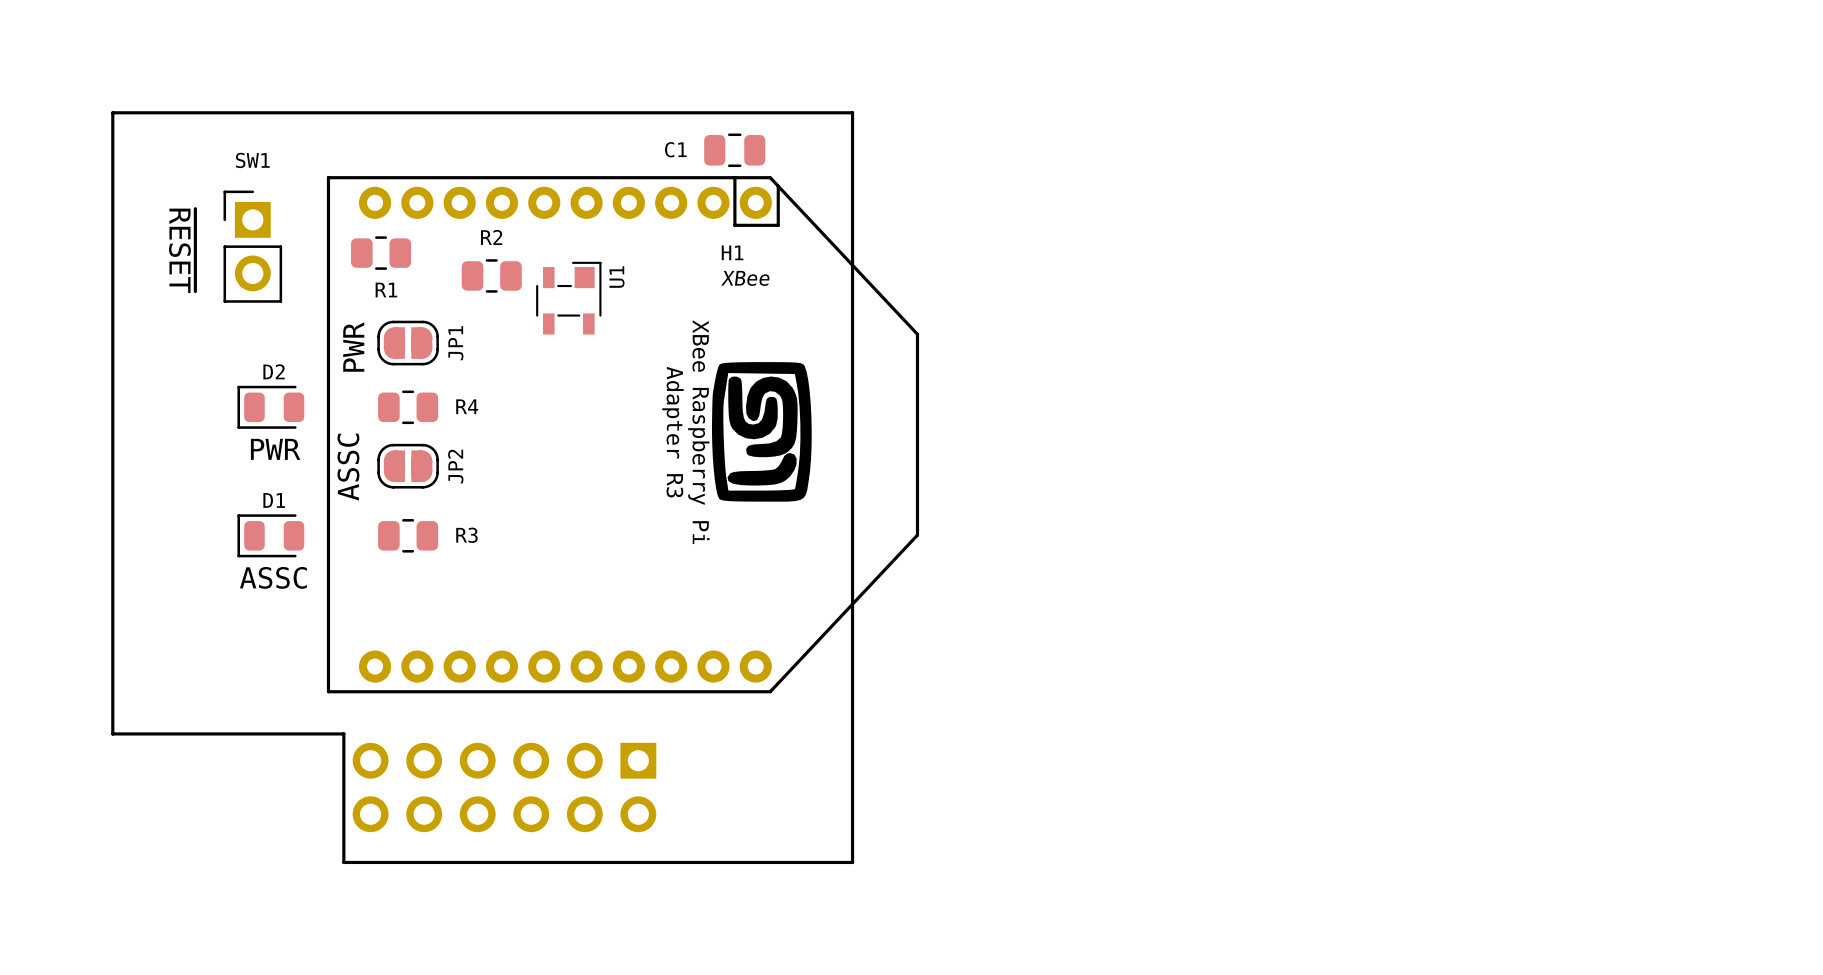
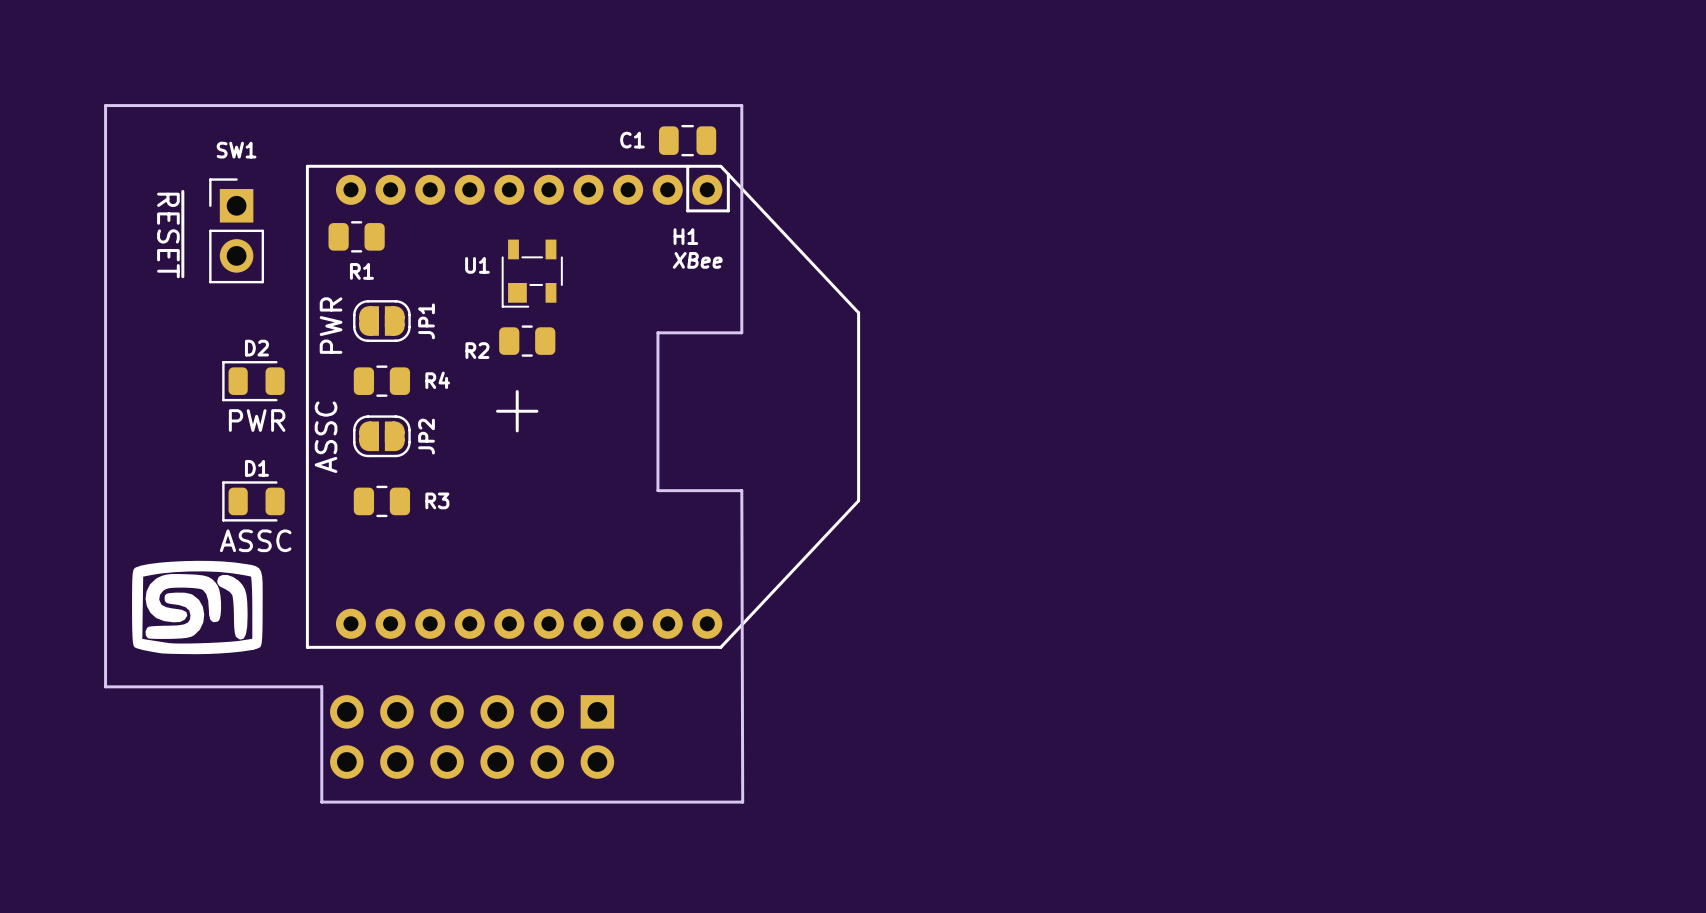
board edge: (792, 112) (852, 112) (852, 862) (343, 862) (343, 857) -> (741, 105) (741, 332) (657, 332) (657, 490) (741, 490) (742, 802) (321, 802)
R2 name position: R2 (491, 237) -> R2 (477, 350)
R2 position: (491, 275) -> (527, 341)
U1 rotation: 0° (568, 298) -> 180° (532, 273)
drawing: [711, 362, 812, 502] -> none
drawing: none -> [496, 390, 539, 433]
text: Adapter R3 (672, 432) -> none
text: XBee Raspberry Pi (698, 432) -> none
drawing: none -> [132, 560, 263, 655]

